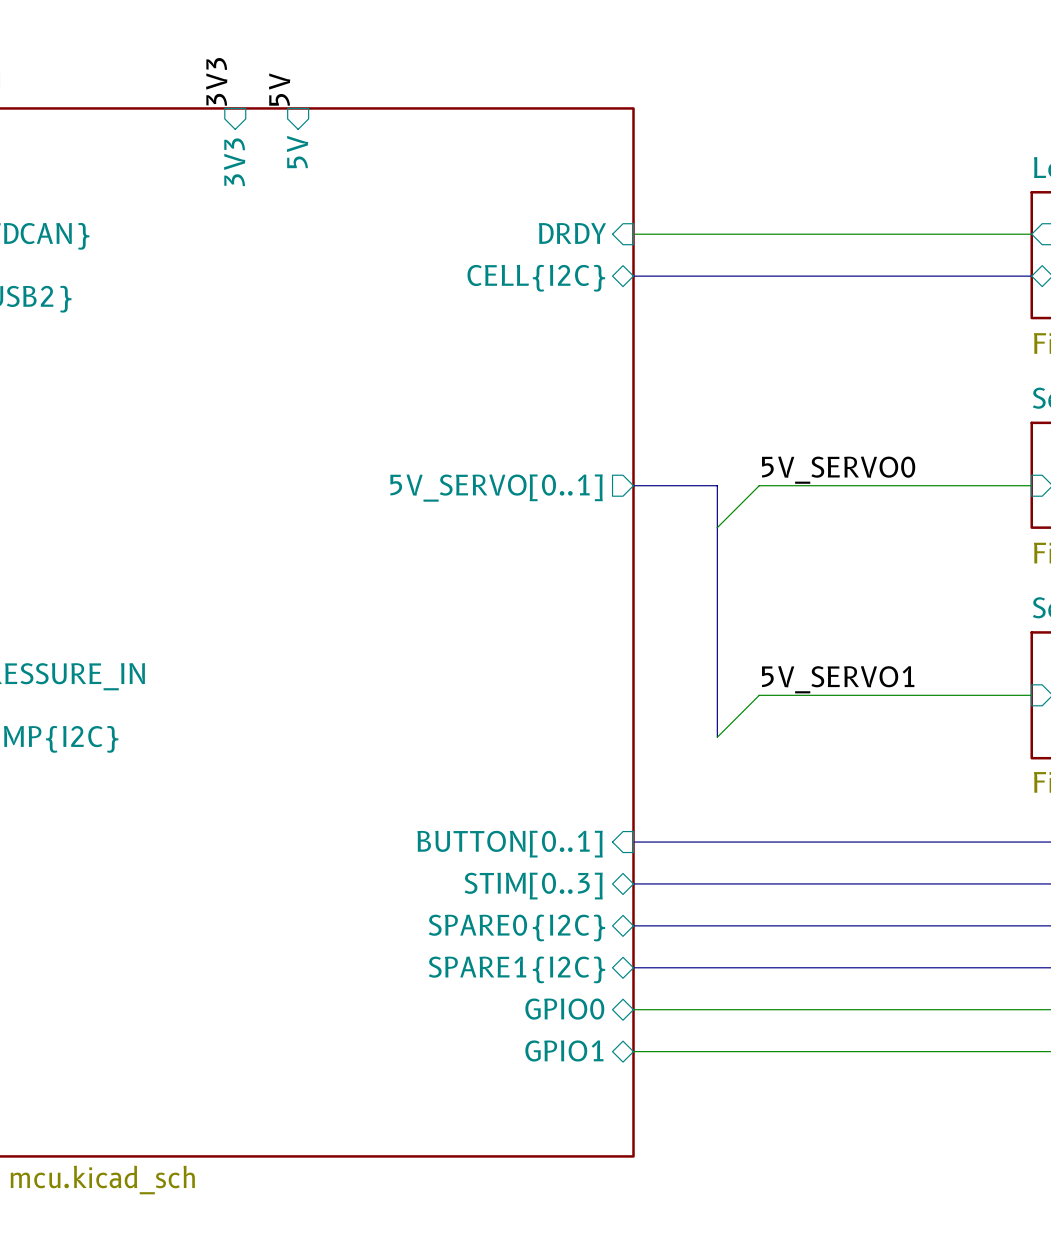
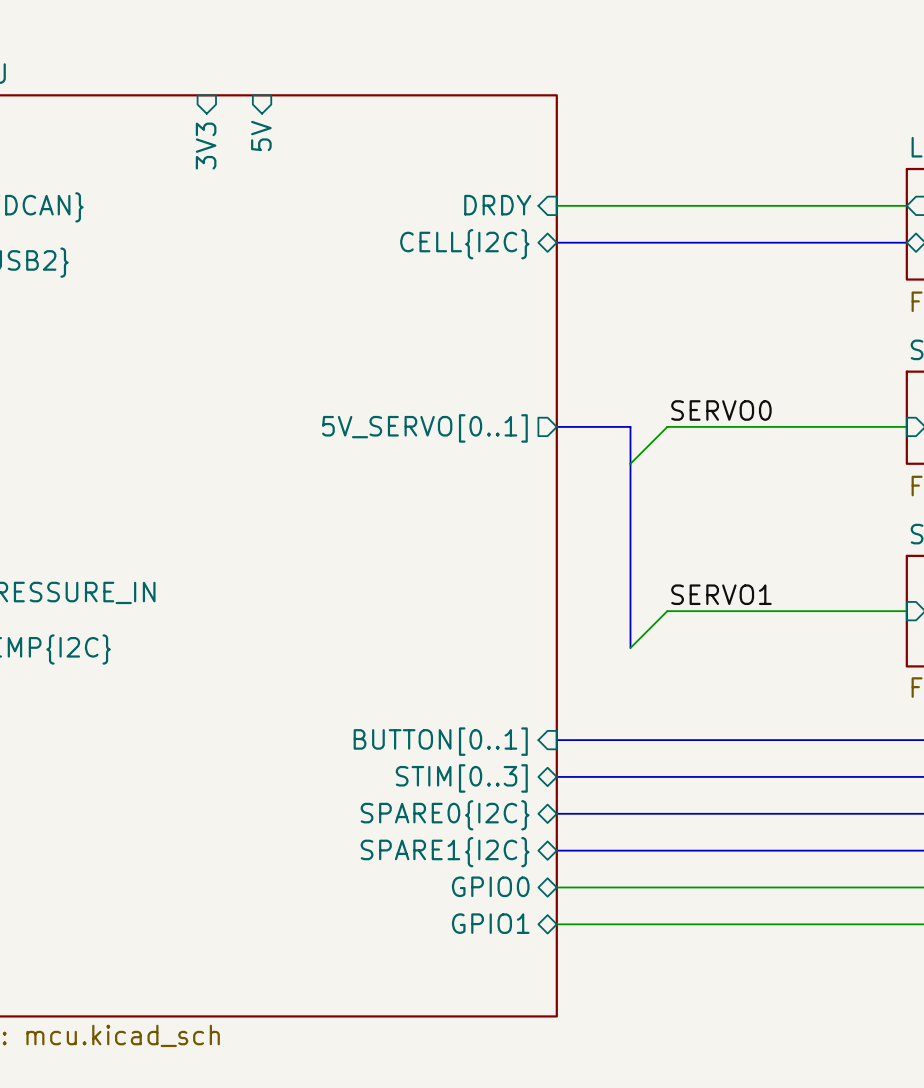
label: 3V3 (216, 81) -> none
label: 5V (279, 89) -> none
label: 5V_SERVO0 (838, 470) -> SERVO0 (721, 410)
label: 5V_SERVO1 (838, 679) -> SERVO1 (721, 594)

